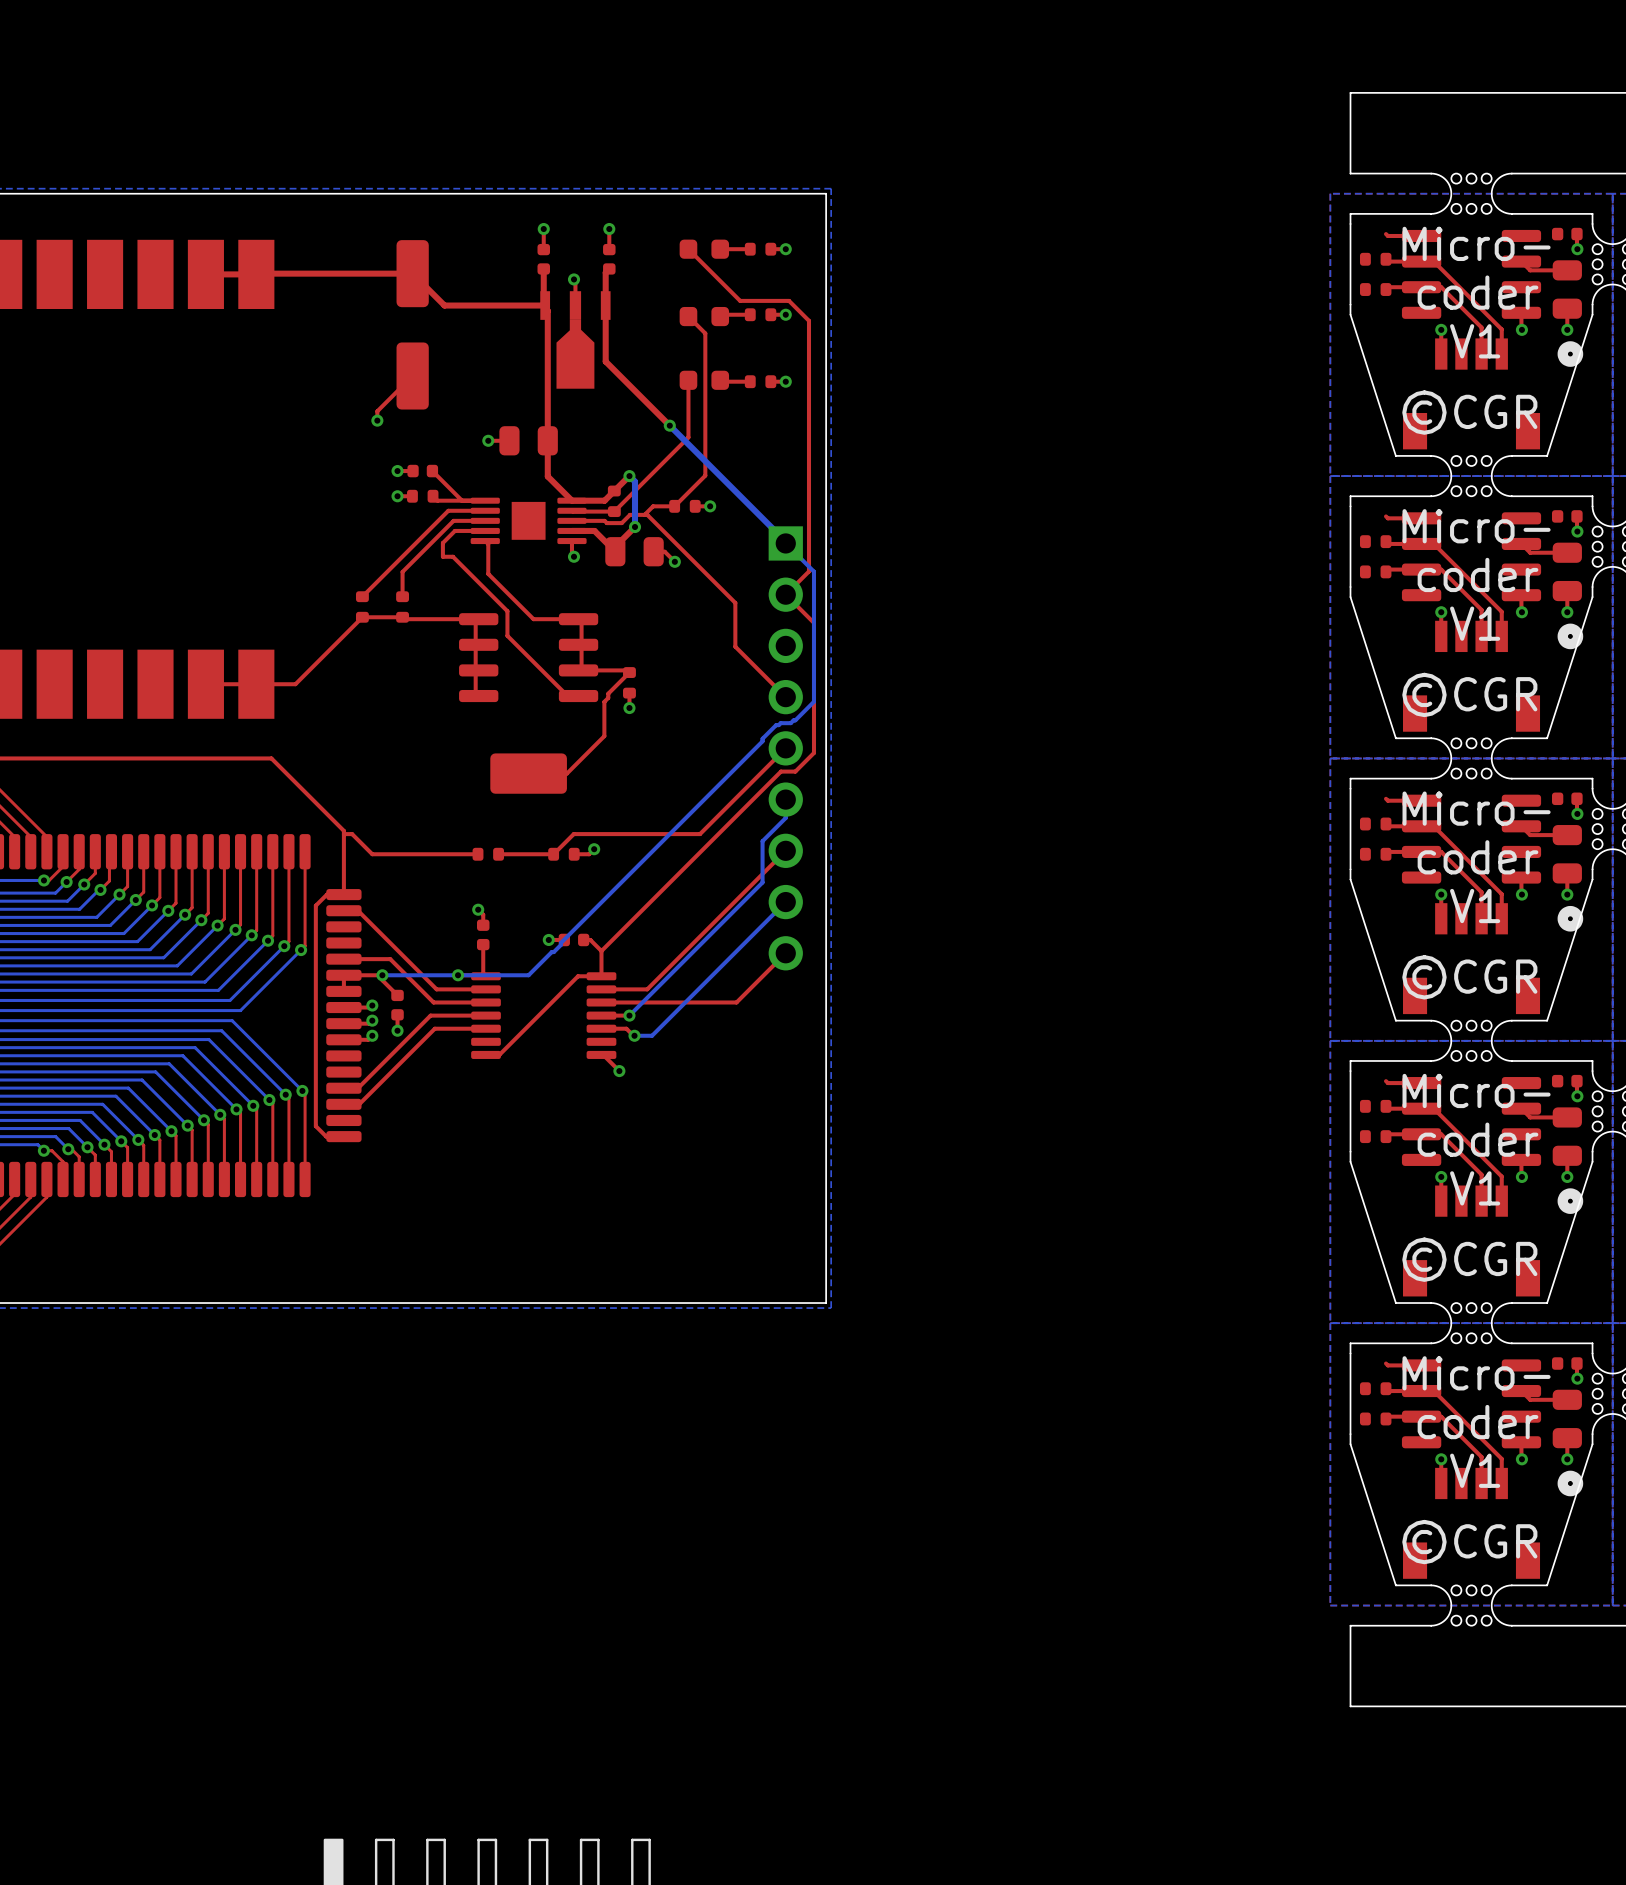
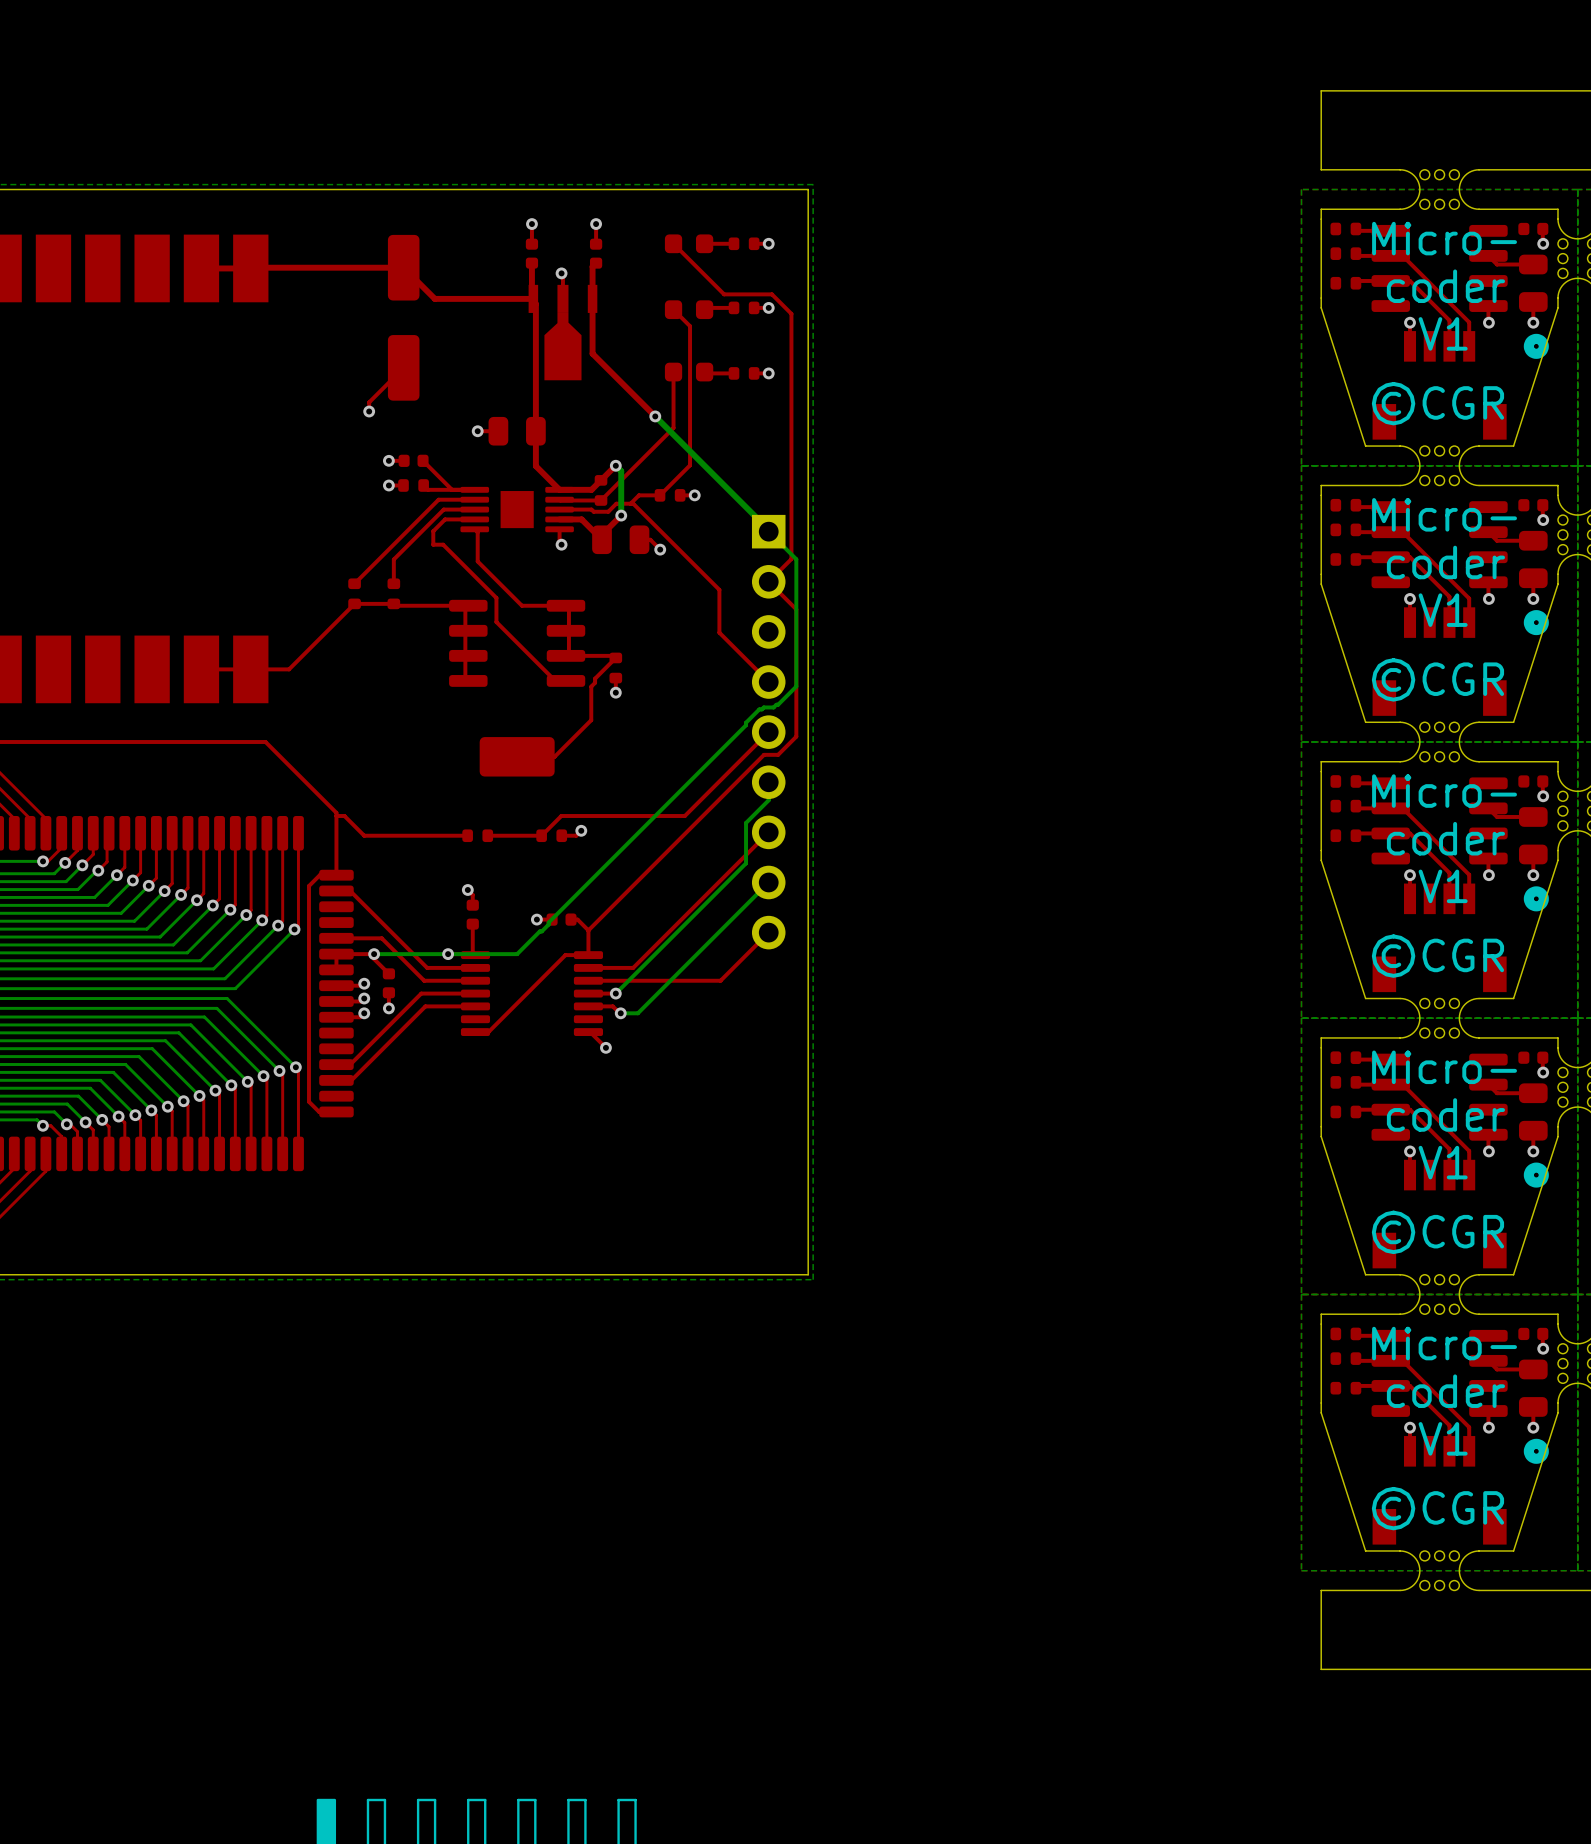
part: none -> (1345, 228)
part: none -> (1345, 505)
part: none -> (1345, 781)
part: none -> (1345, 1057)
part: none -> (1345, 1333)

